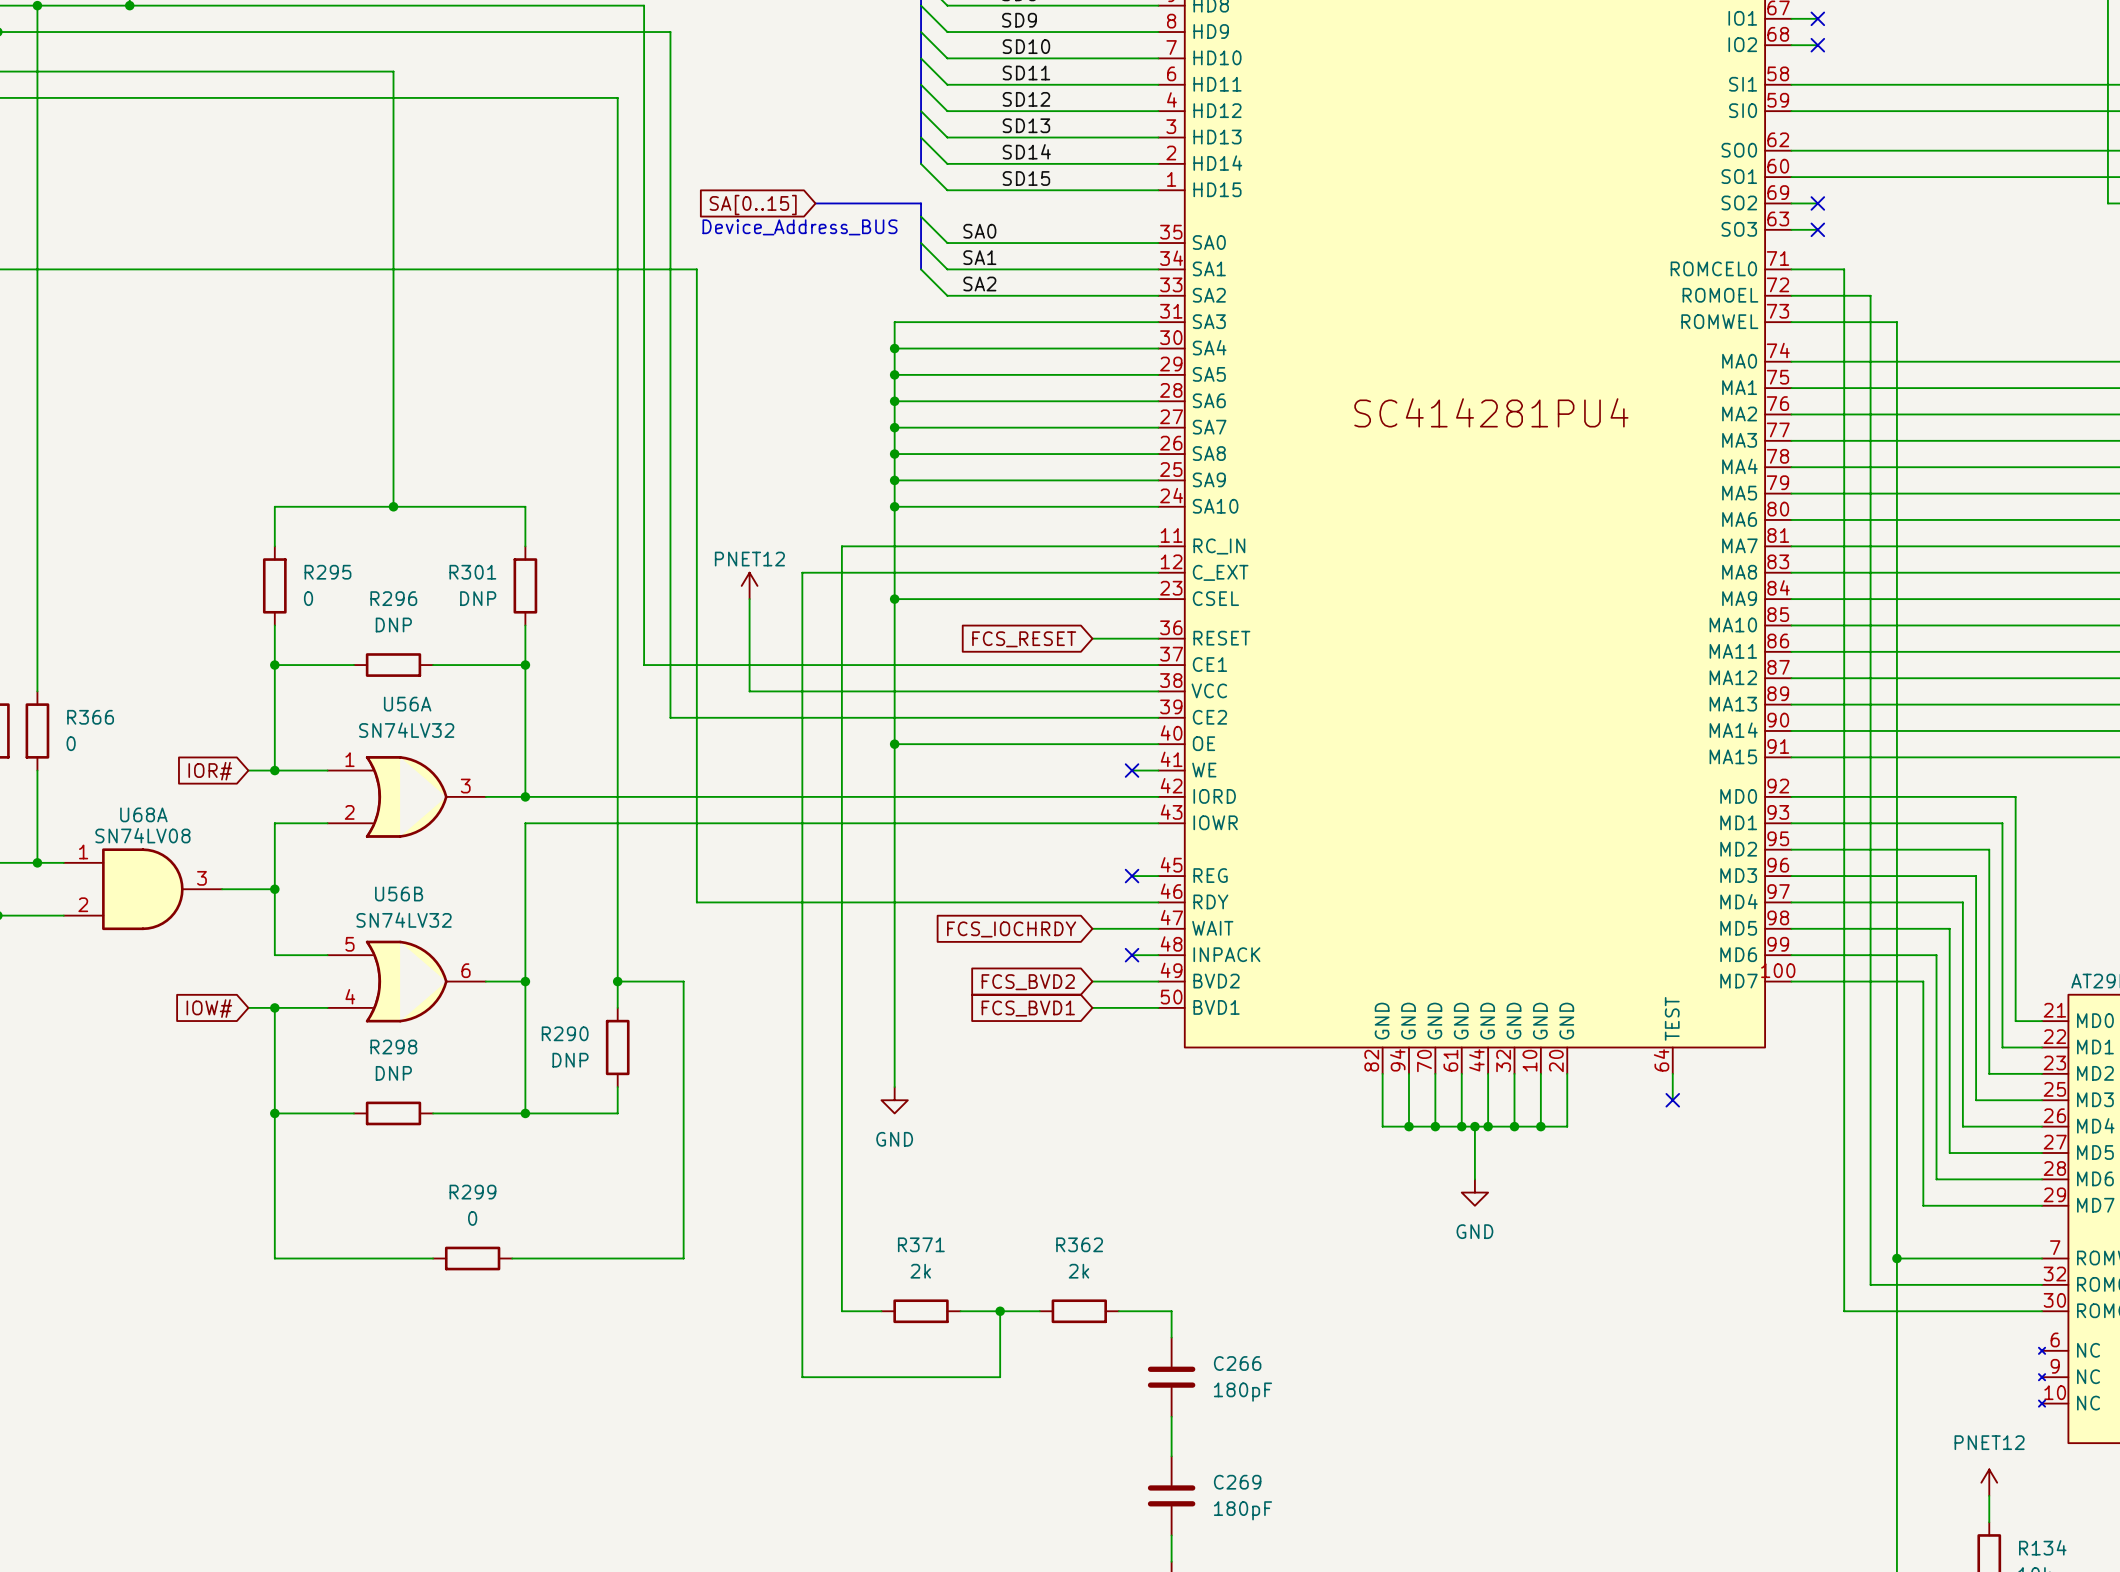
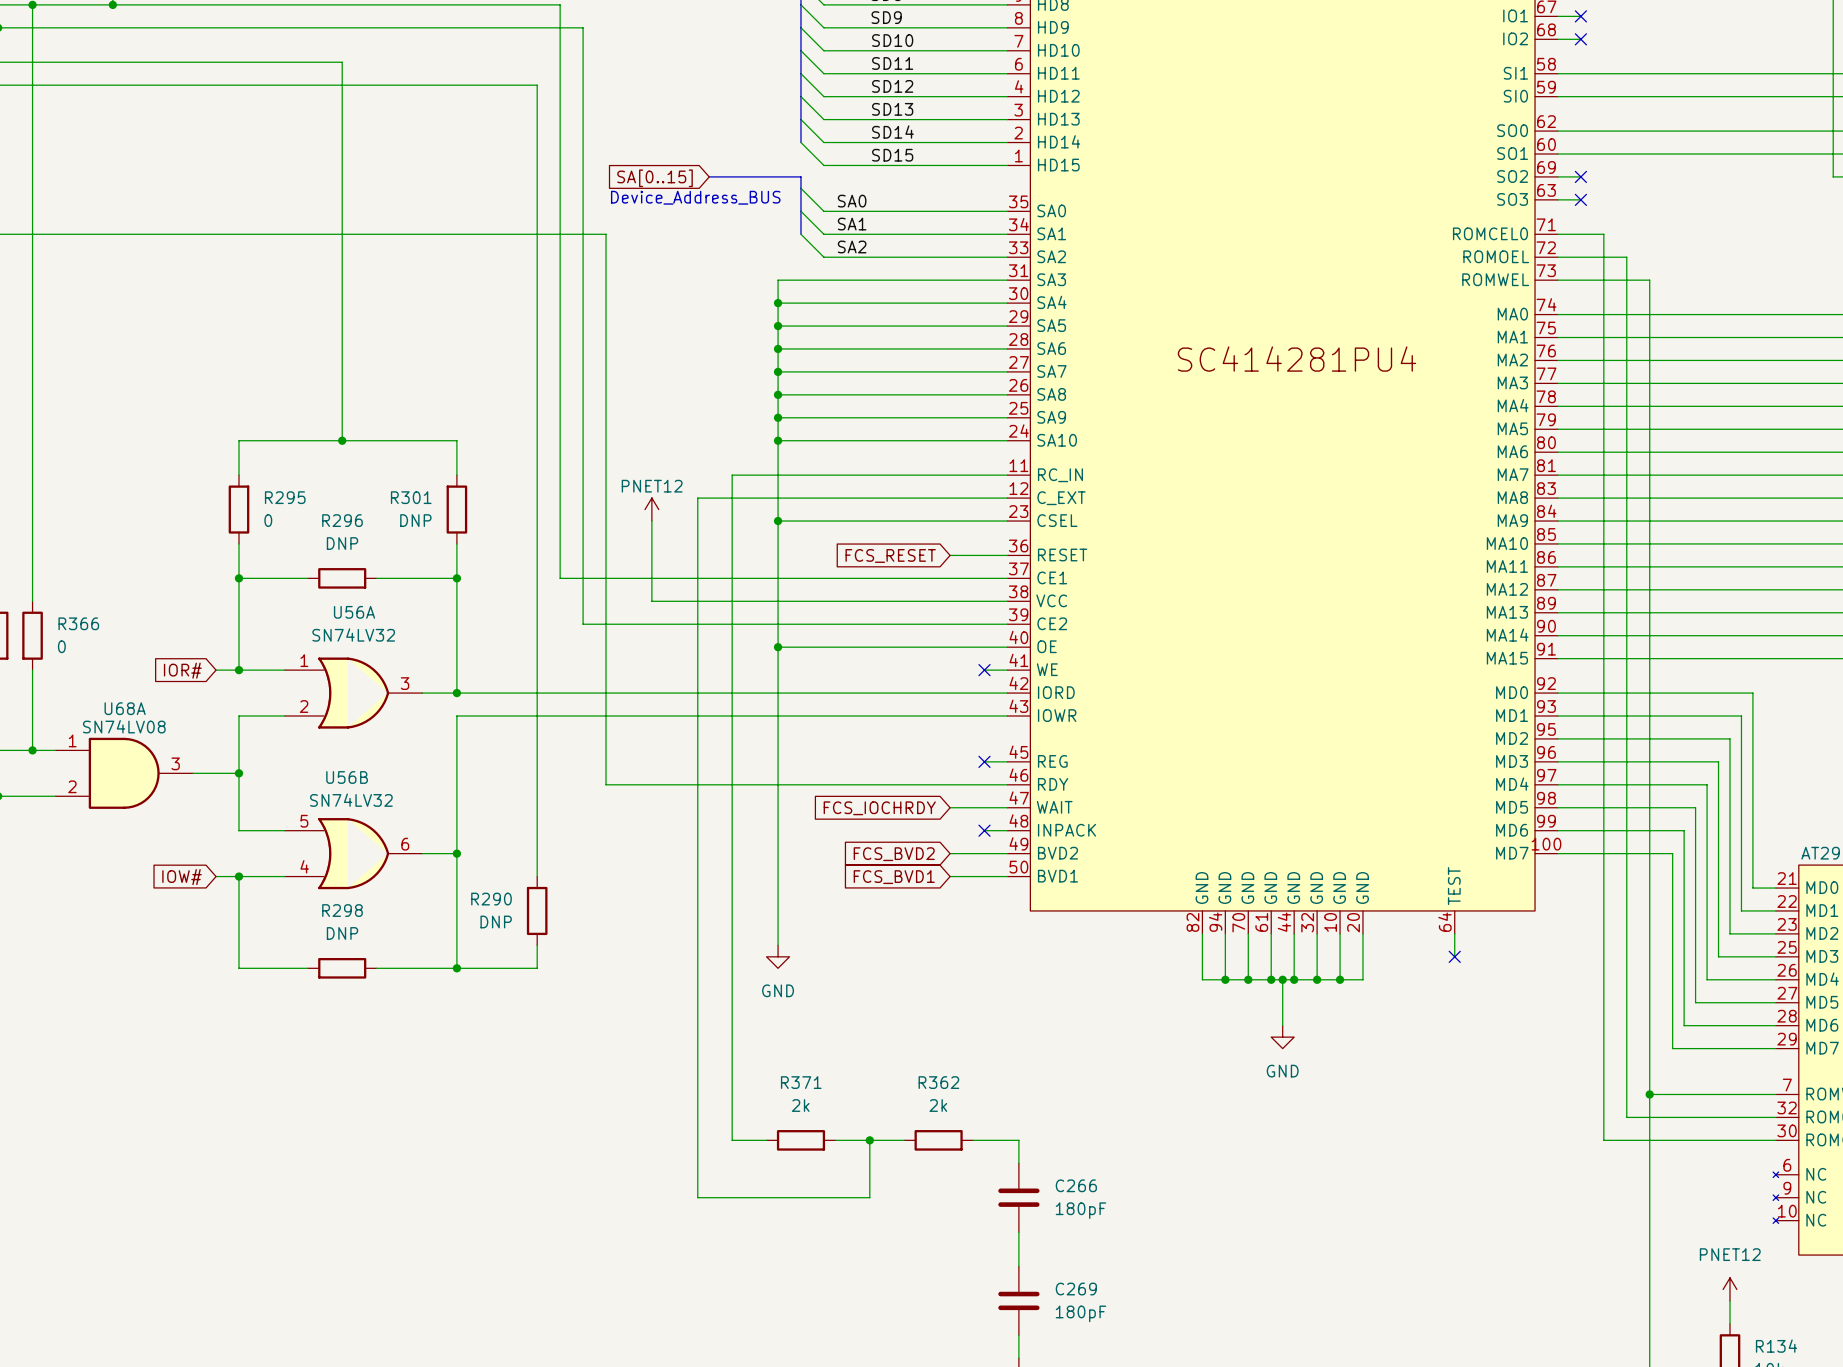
wire: (617, 981) (683, 981) (683, 1258) (512, 1258) -> none
junction: (617, 981) -> none
wire: (274, 1113) (274, 1258) (433, 1258) -> none
junction: (274, 1113) -> none
R299: 0 (472, 1258) -> none

